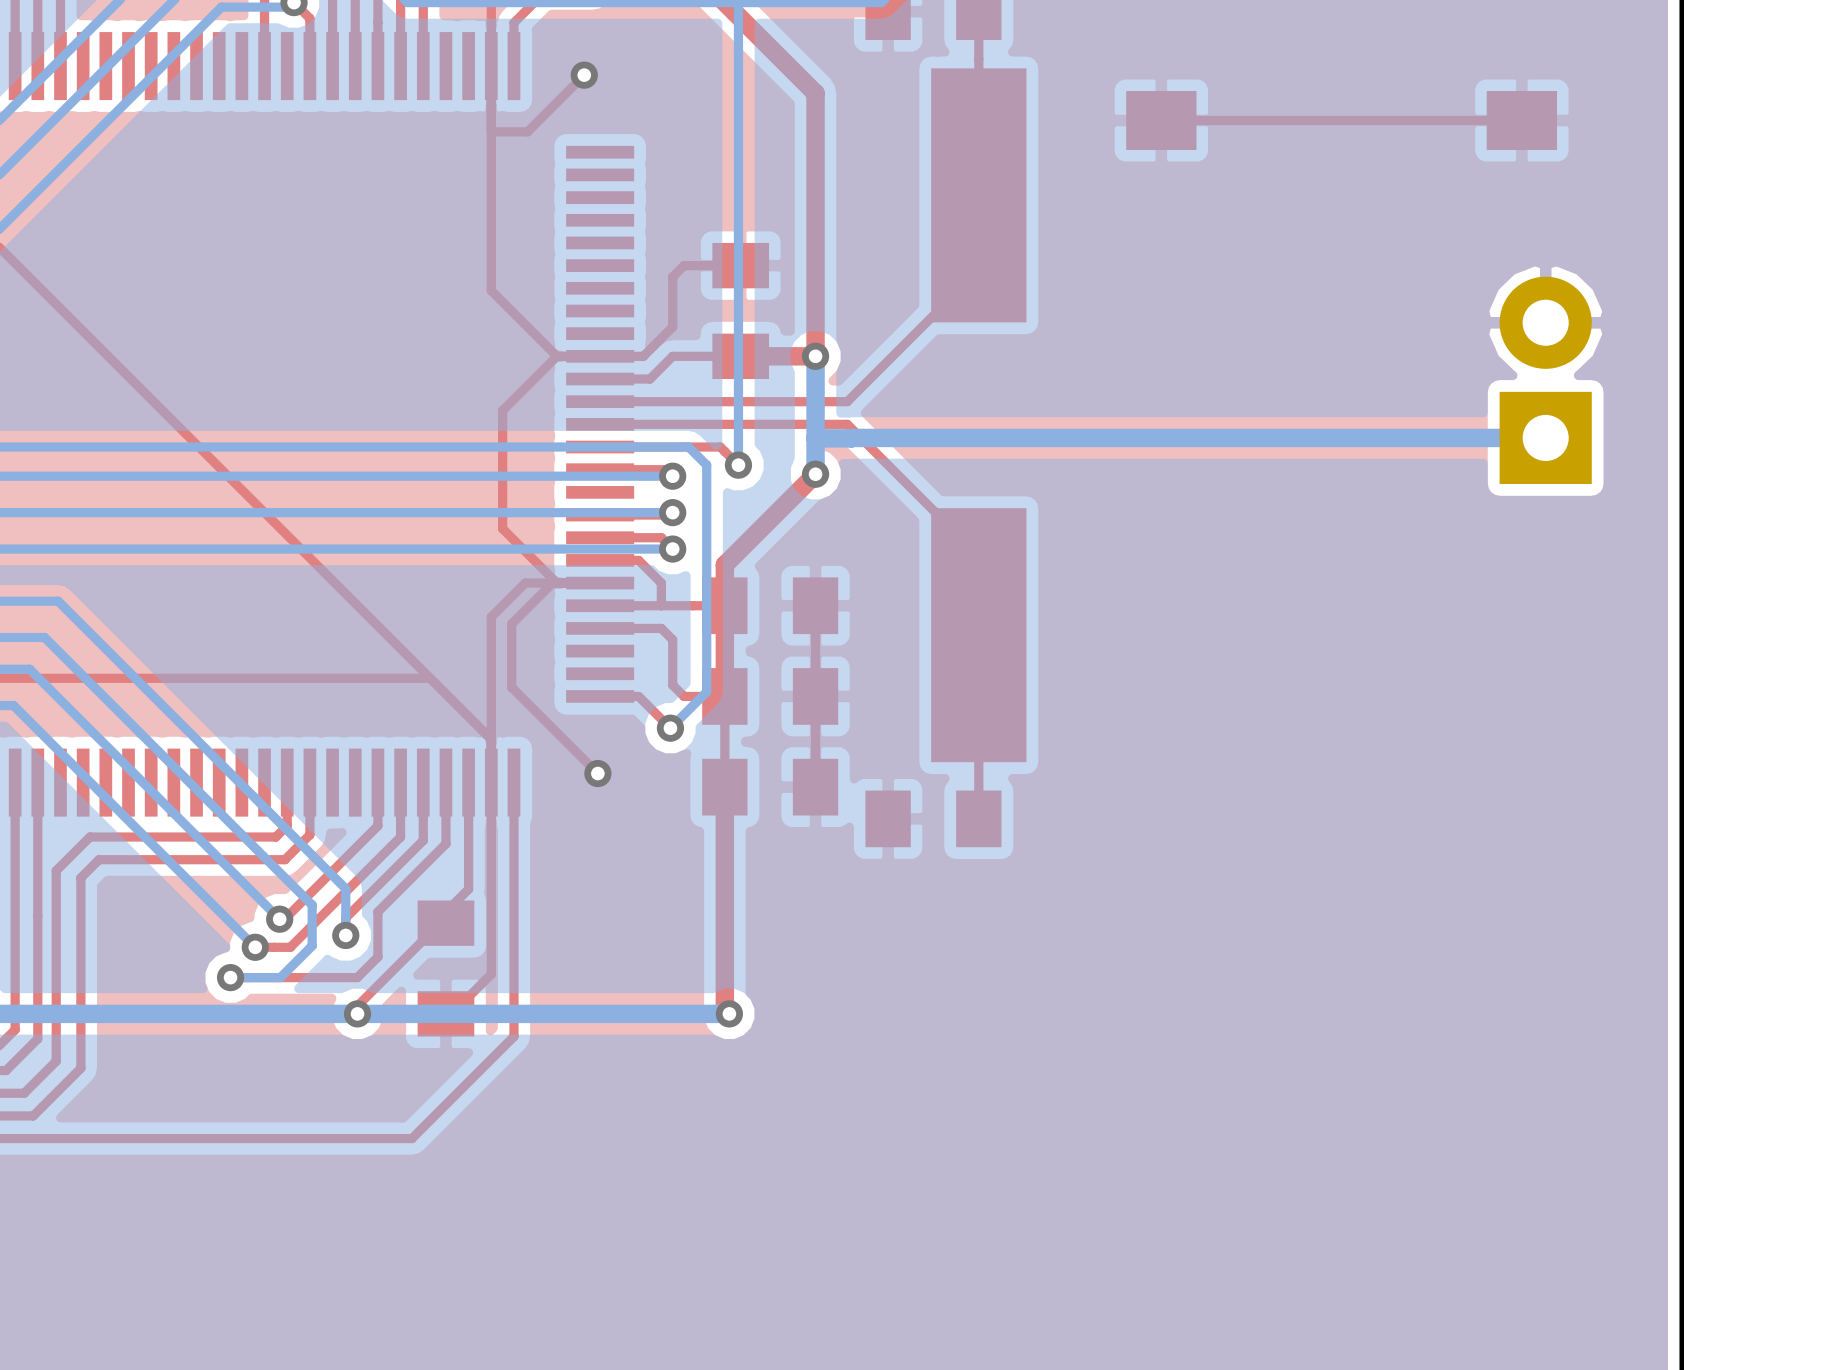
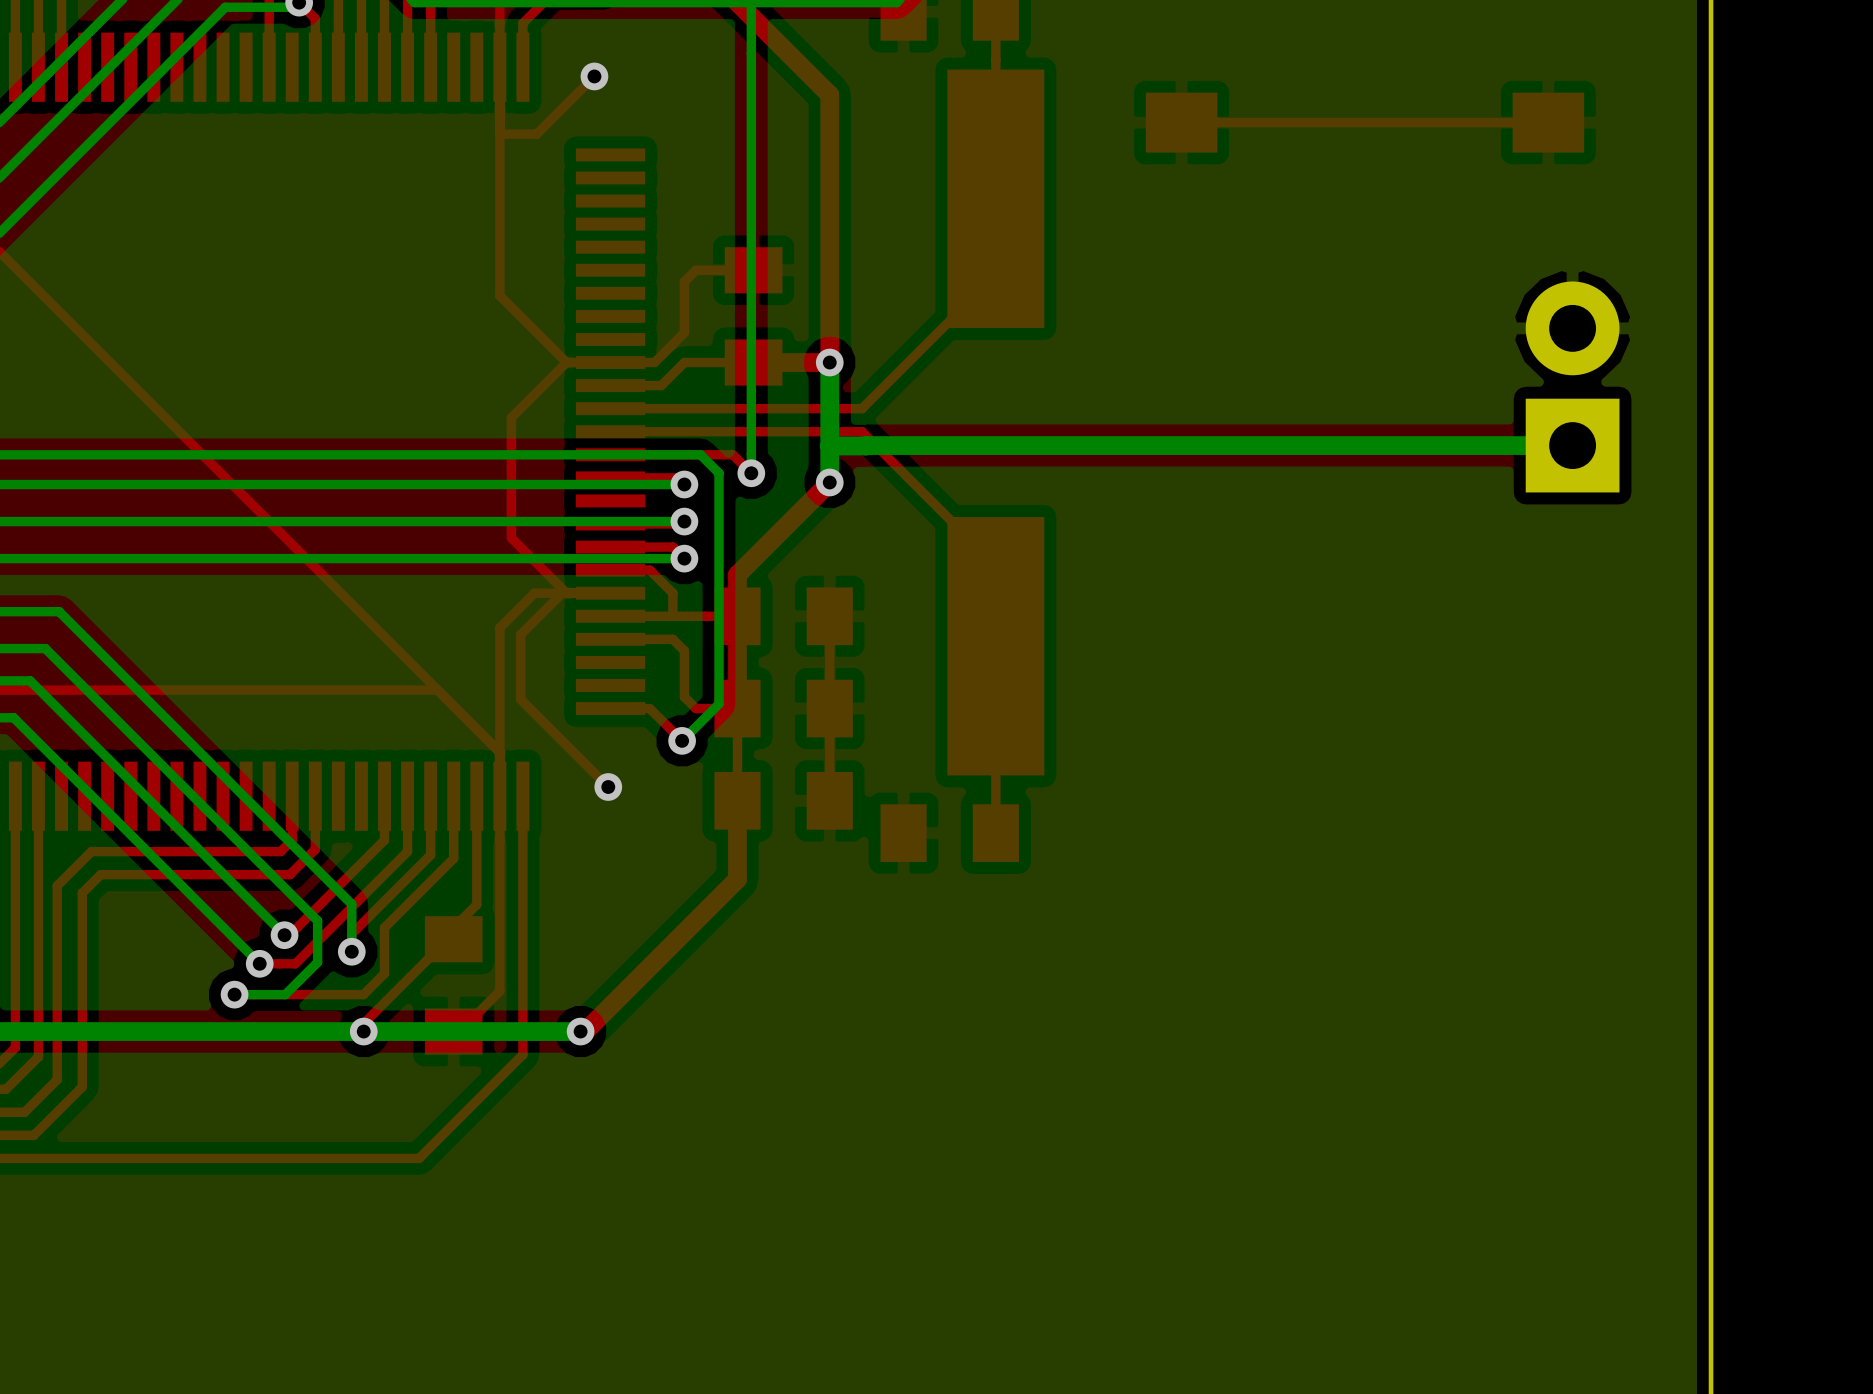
top track: (724, 864) (724, 1009) (729, 1013) -> (737, 879) (585, 1031) (580, 1031)
bottom track: (729, 1013) (570, 1013) -> none
via position: (729, 1013) -> (580, 1031)

